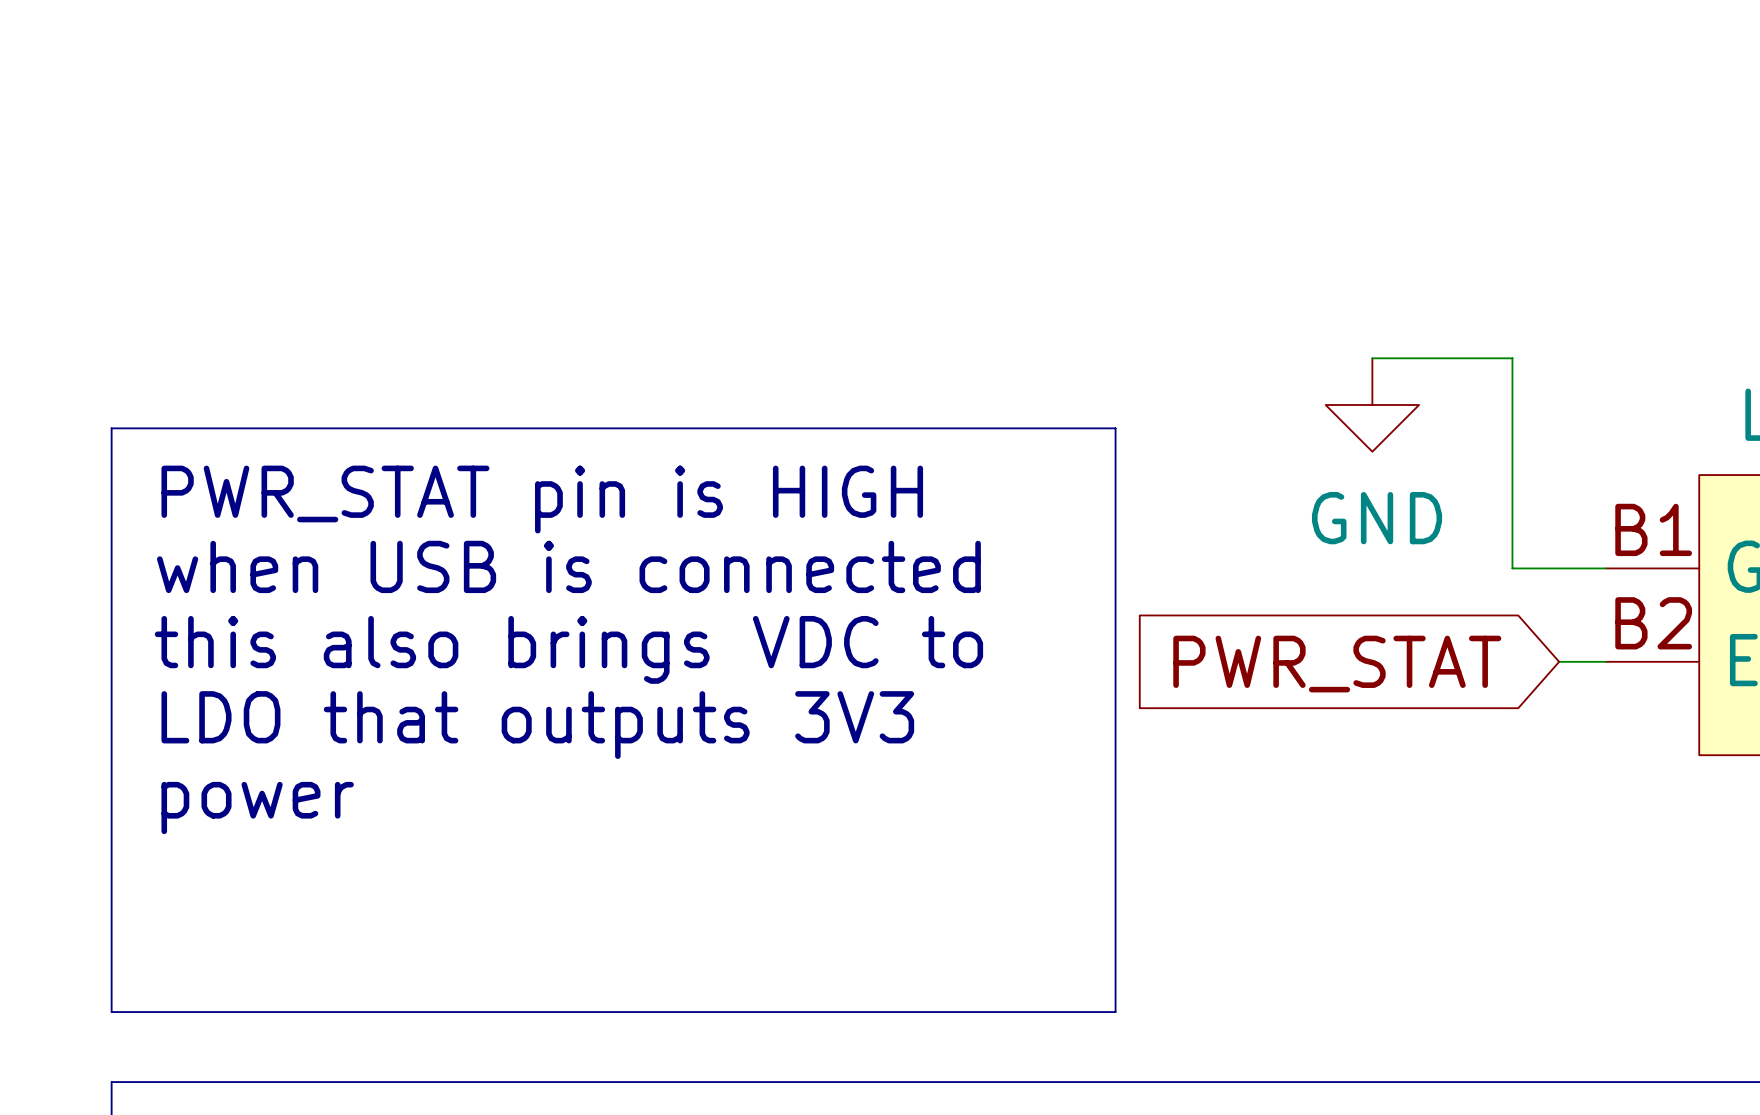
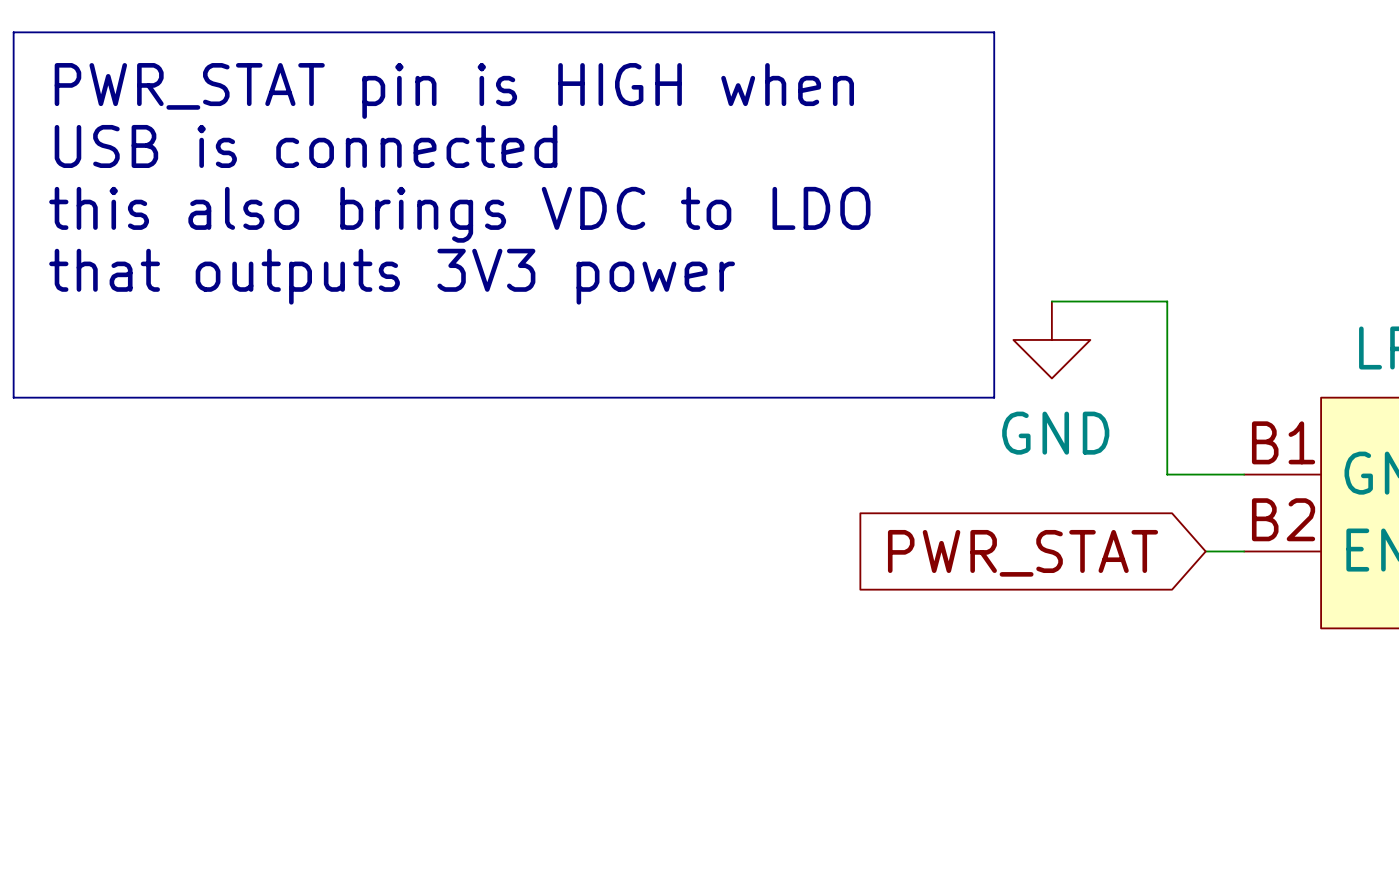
text: none -> PWR_STAT pin is HIGH when (454, 90)
text: none -> USB is connected (306, 146)
text: none -> this also brings VDC to LDO (459, 214)
text: none -> that outputs 3V3 power (392, 276)
line: (111, 428) (1115, 428) (1115, 1012) (111, 1012) (111, 475) -> (13, 359) (13, 32) (994, 32) (994, 397) (13, 397)
text: PWR_STAT pin is HIGH (542, 499) -> none
text: when USB is connected (568, 566) -> none
text: this also brings VDC to (568, 649) -> none
text: LDO that outputs 3V3 (537, 725) -> none
text: power (257, 808) -> none

